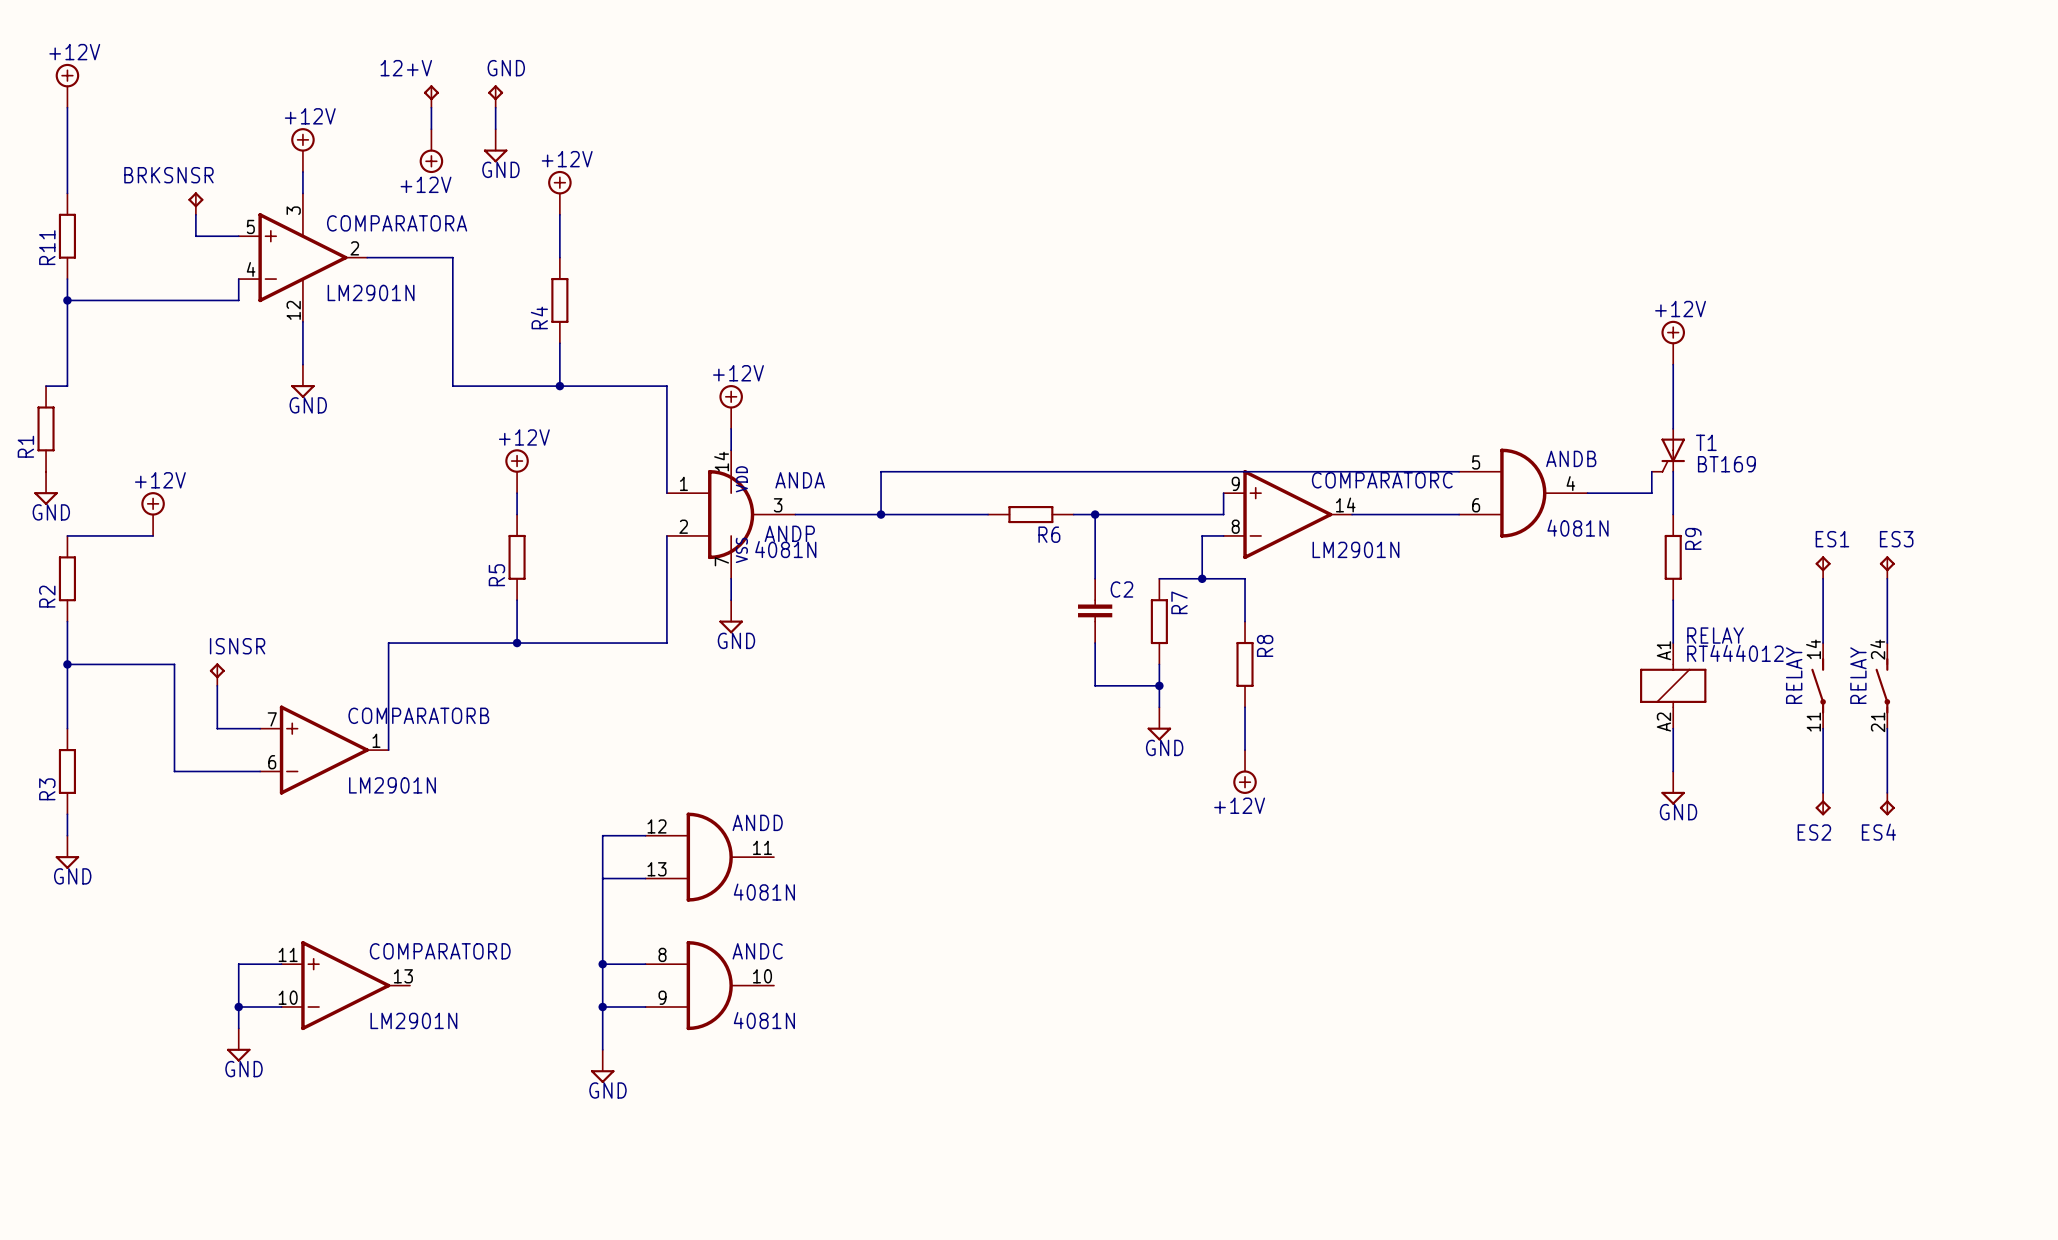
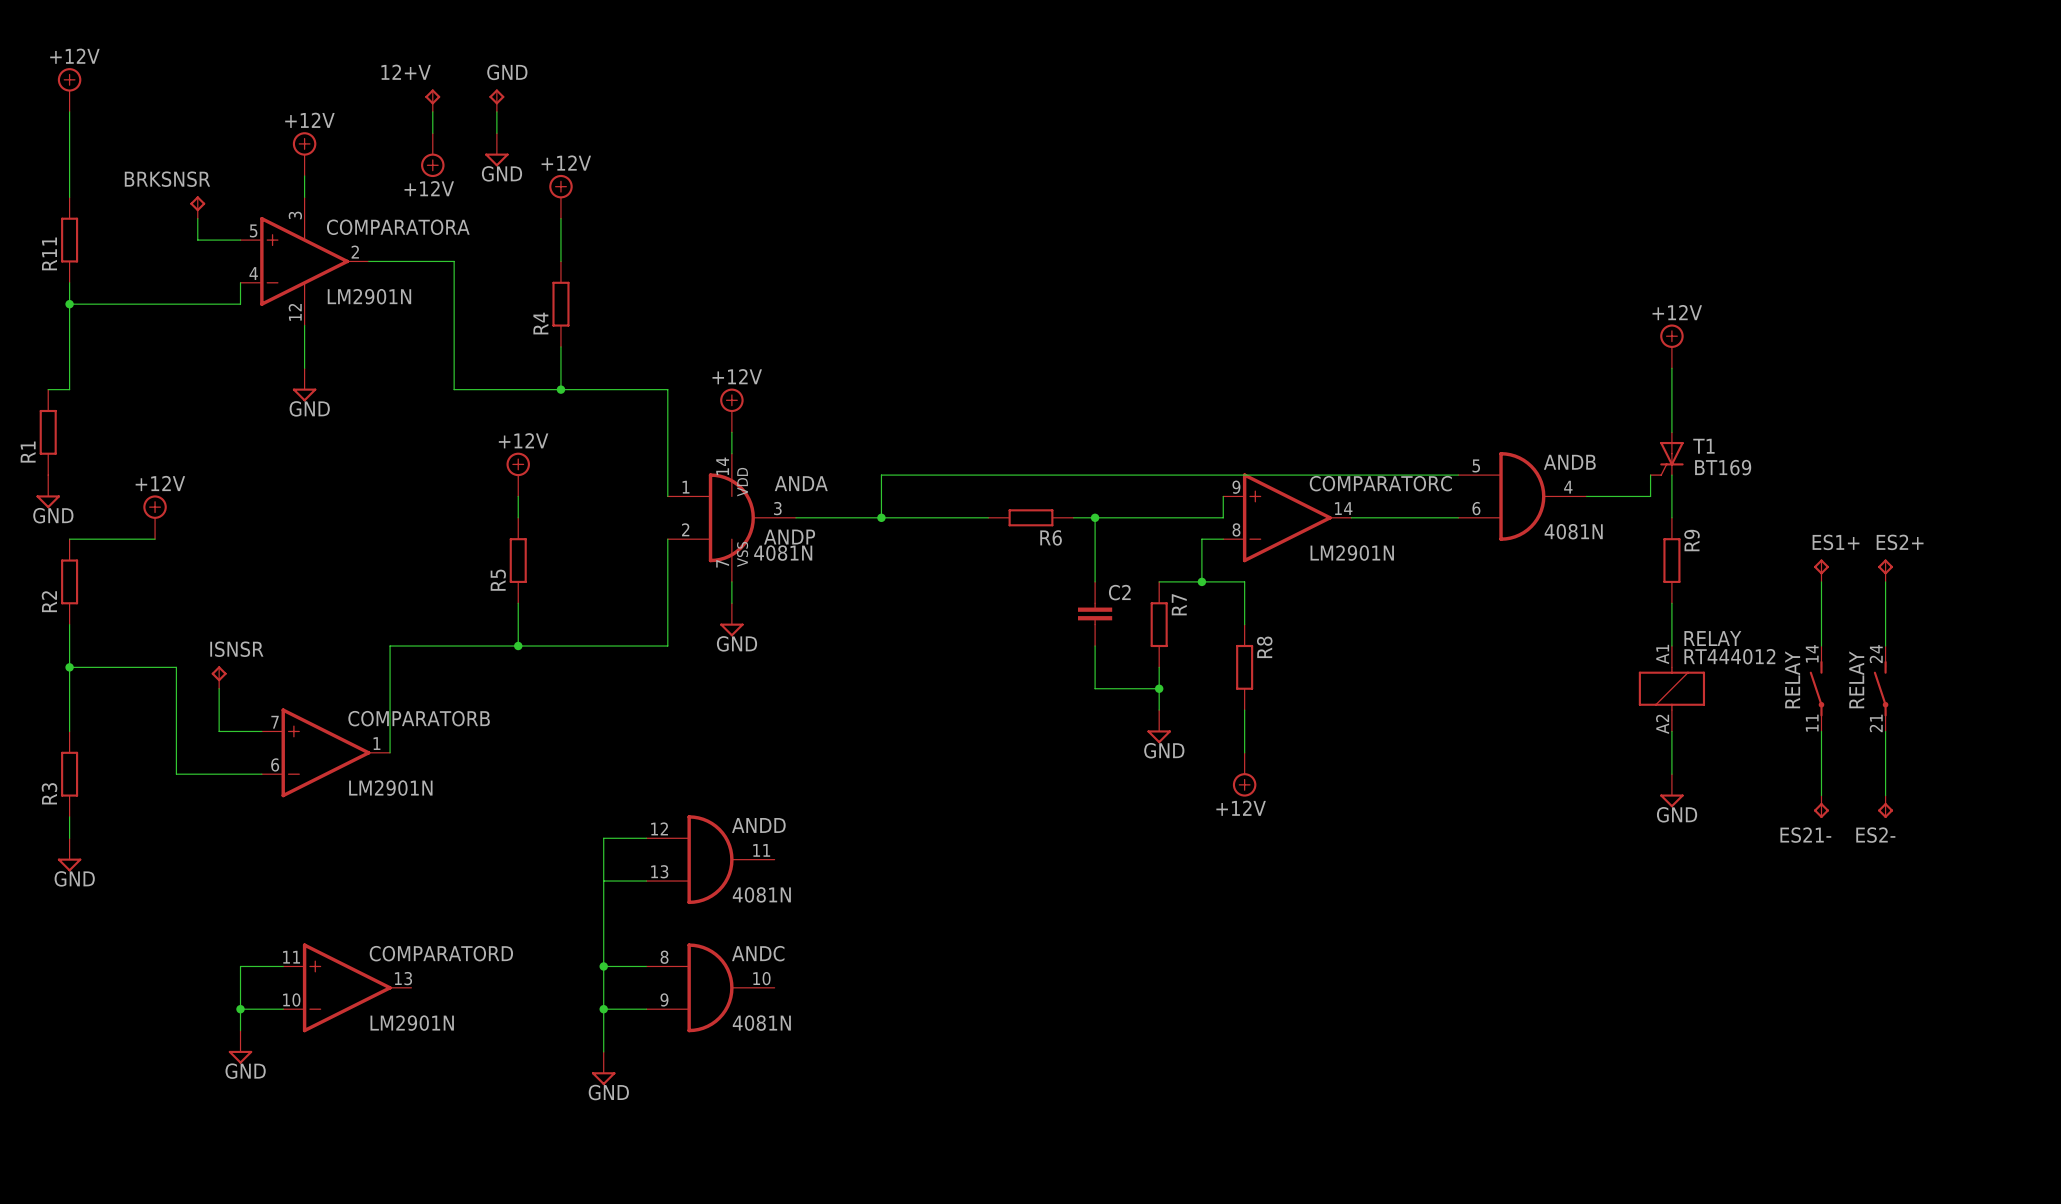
ES1 name: ES1 (1832, 539) -> ES1+ (1836, 542)
ES3 name: ES3 (1896, 539) -> ES2+ (1900, 542)
ES2 name: ES2 (1814, 832) -> ES21- (1805, 835)
ES4 name: ES4 (1878, 832) -> ES2- (1875, 835)

